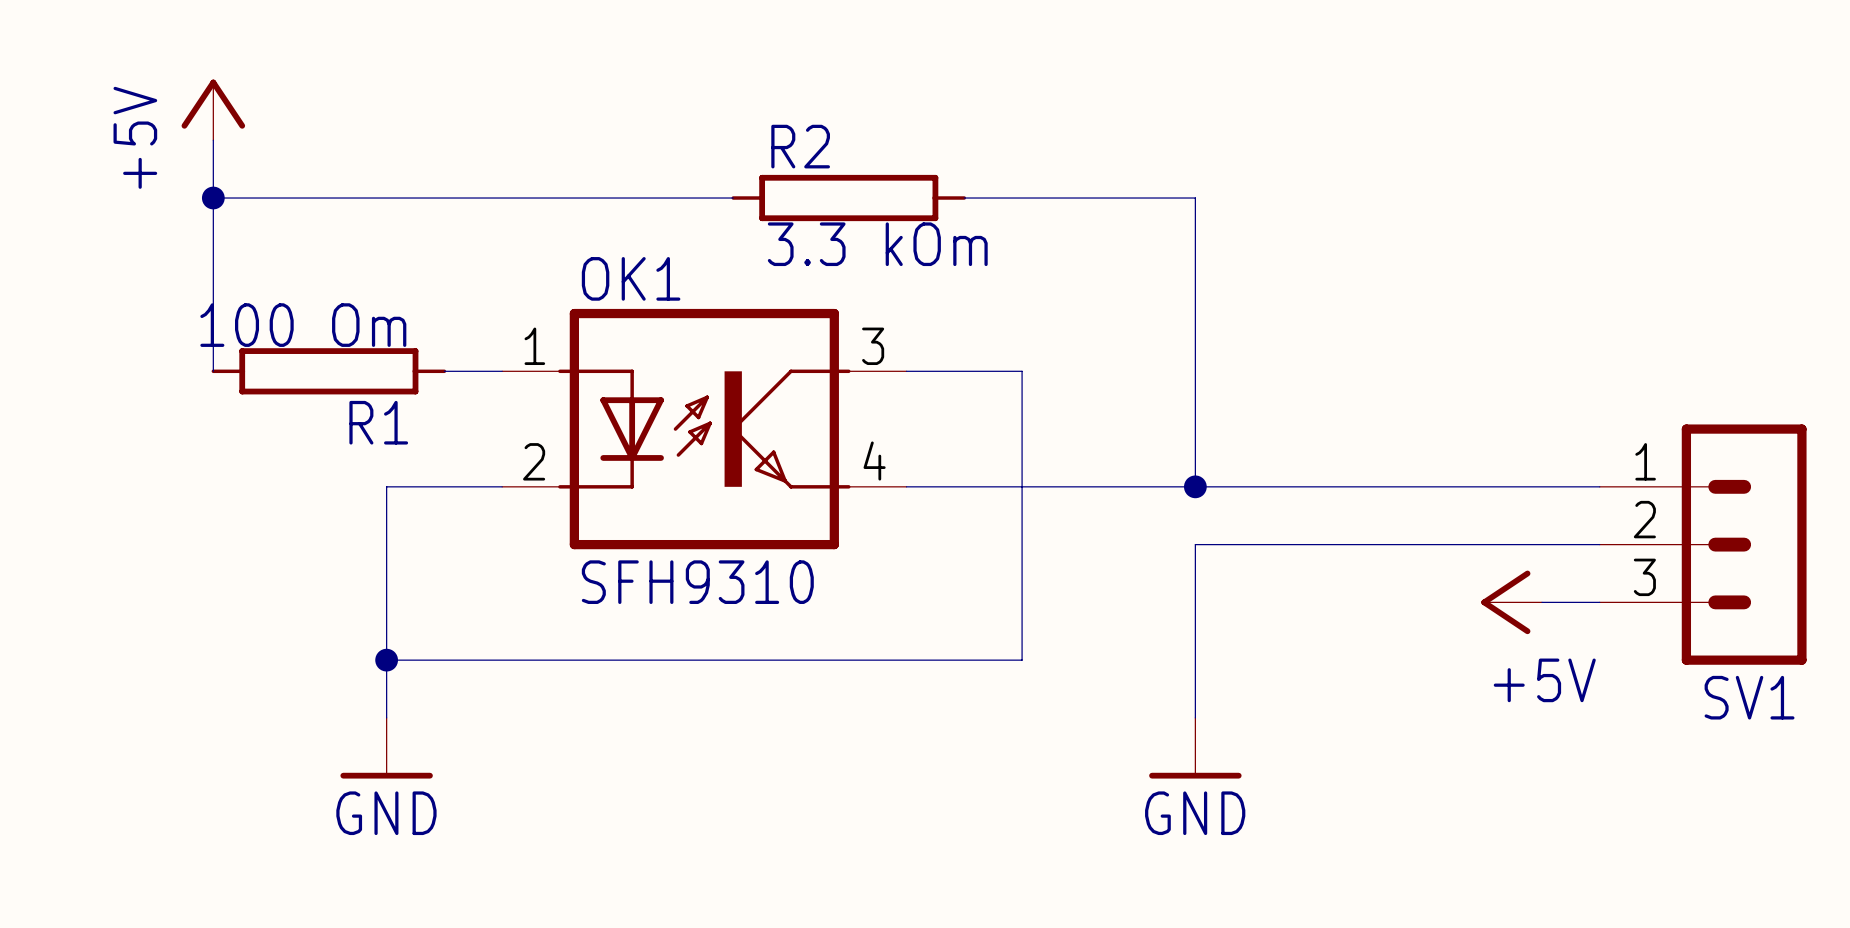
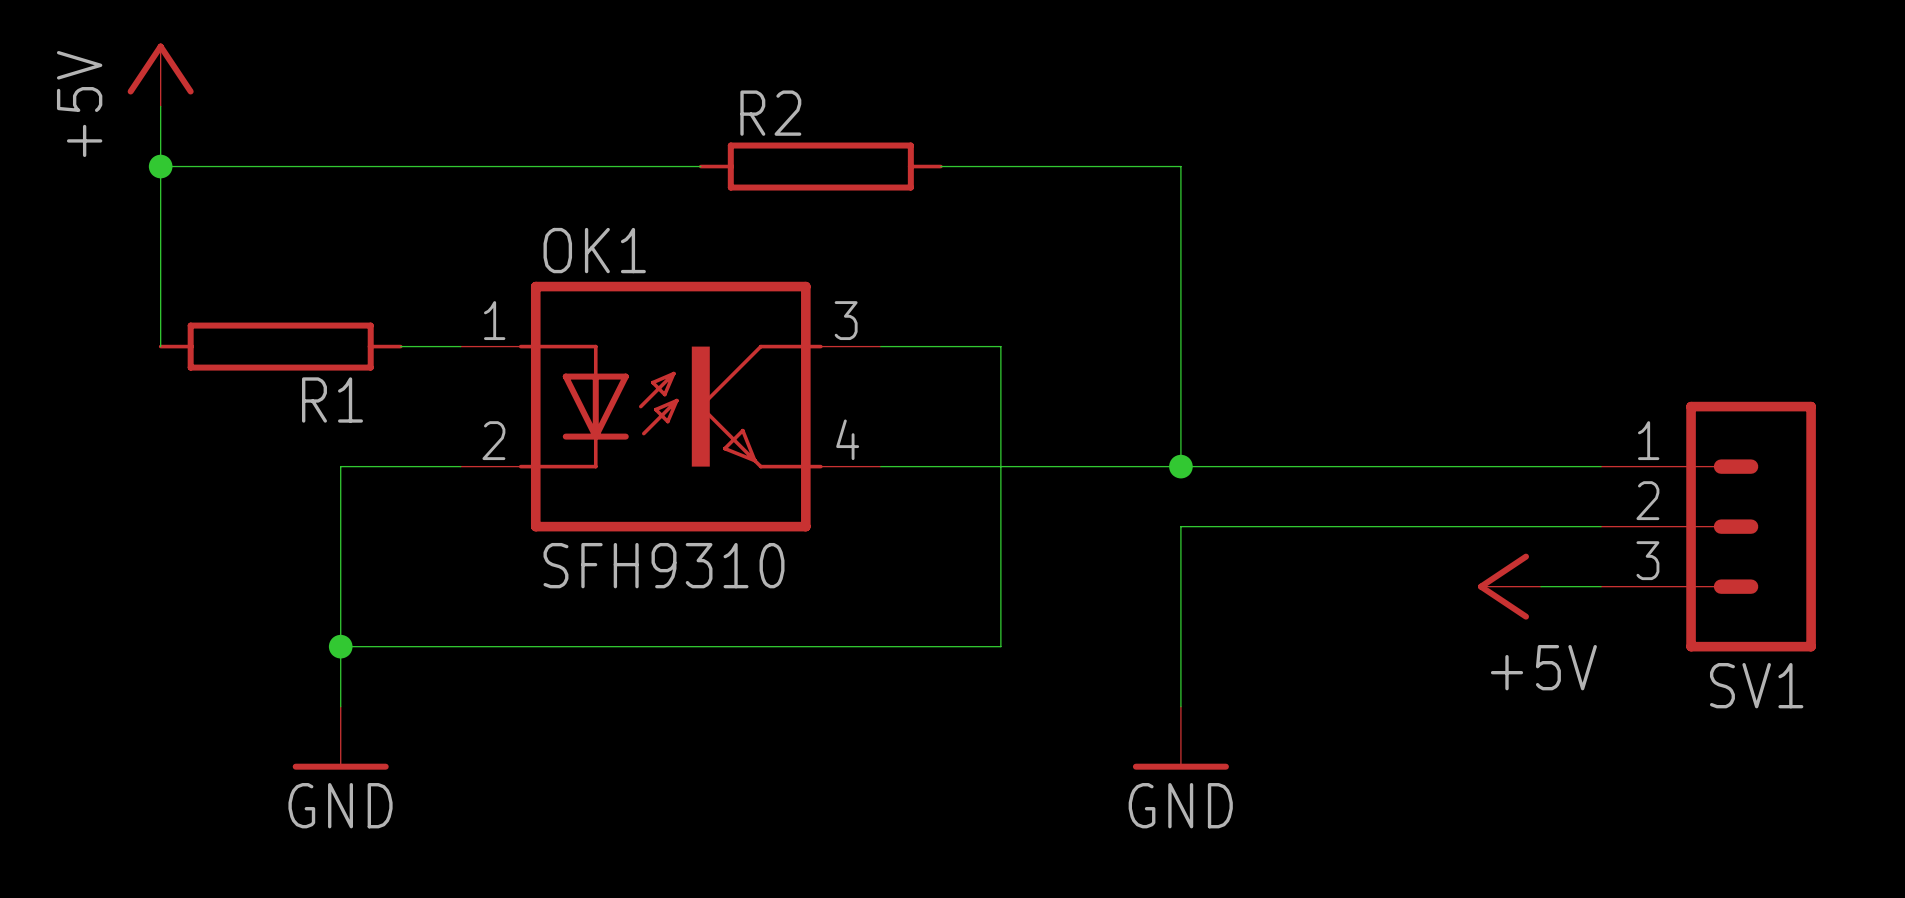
R2 value: 3.3 kOm (877, 244) -> none
R1 value: 100 Om (303, 325) -> none

